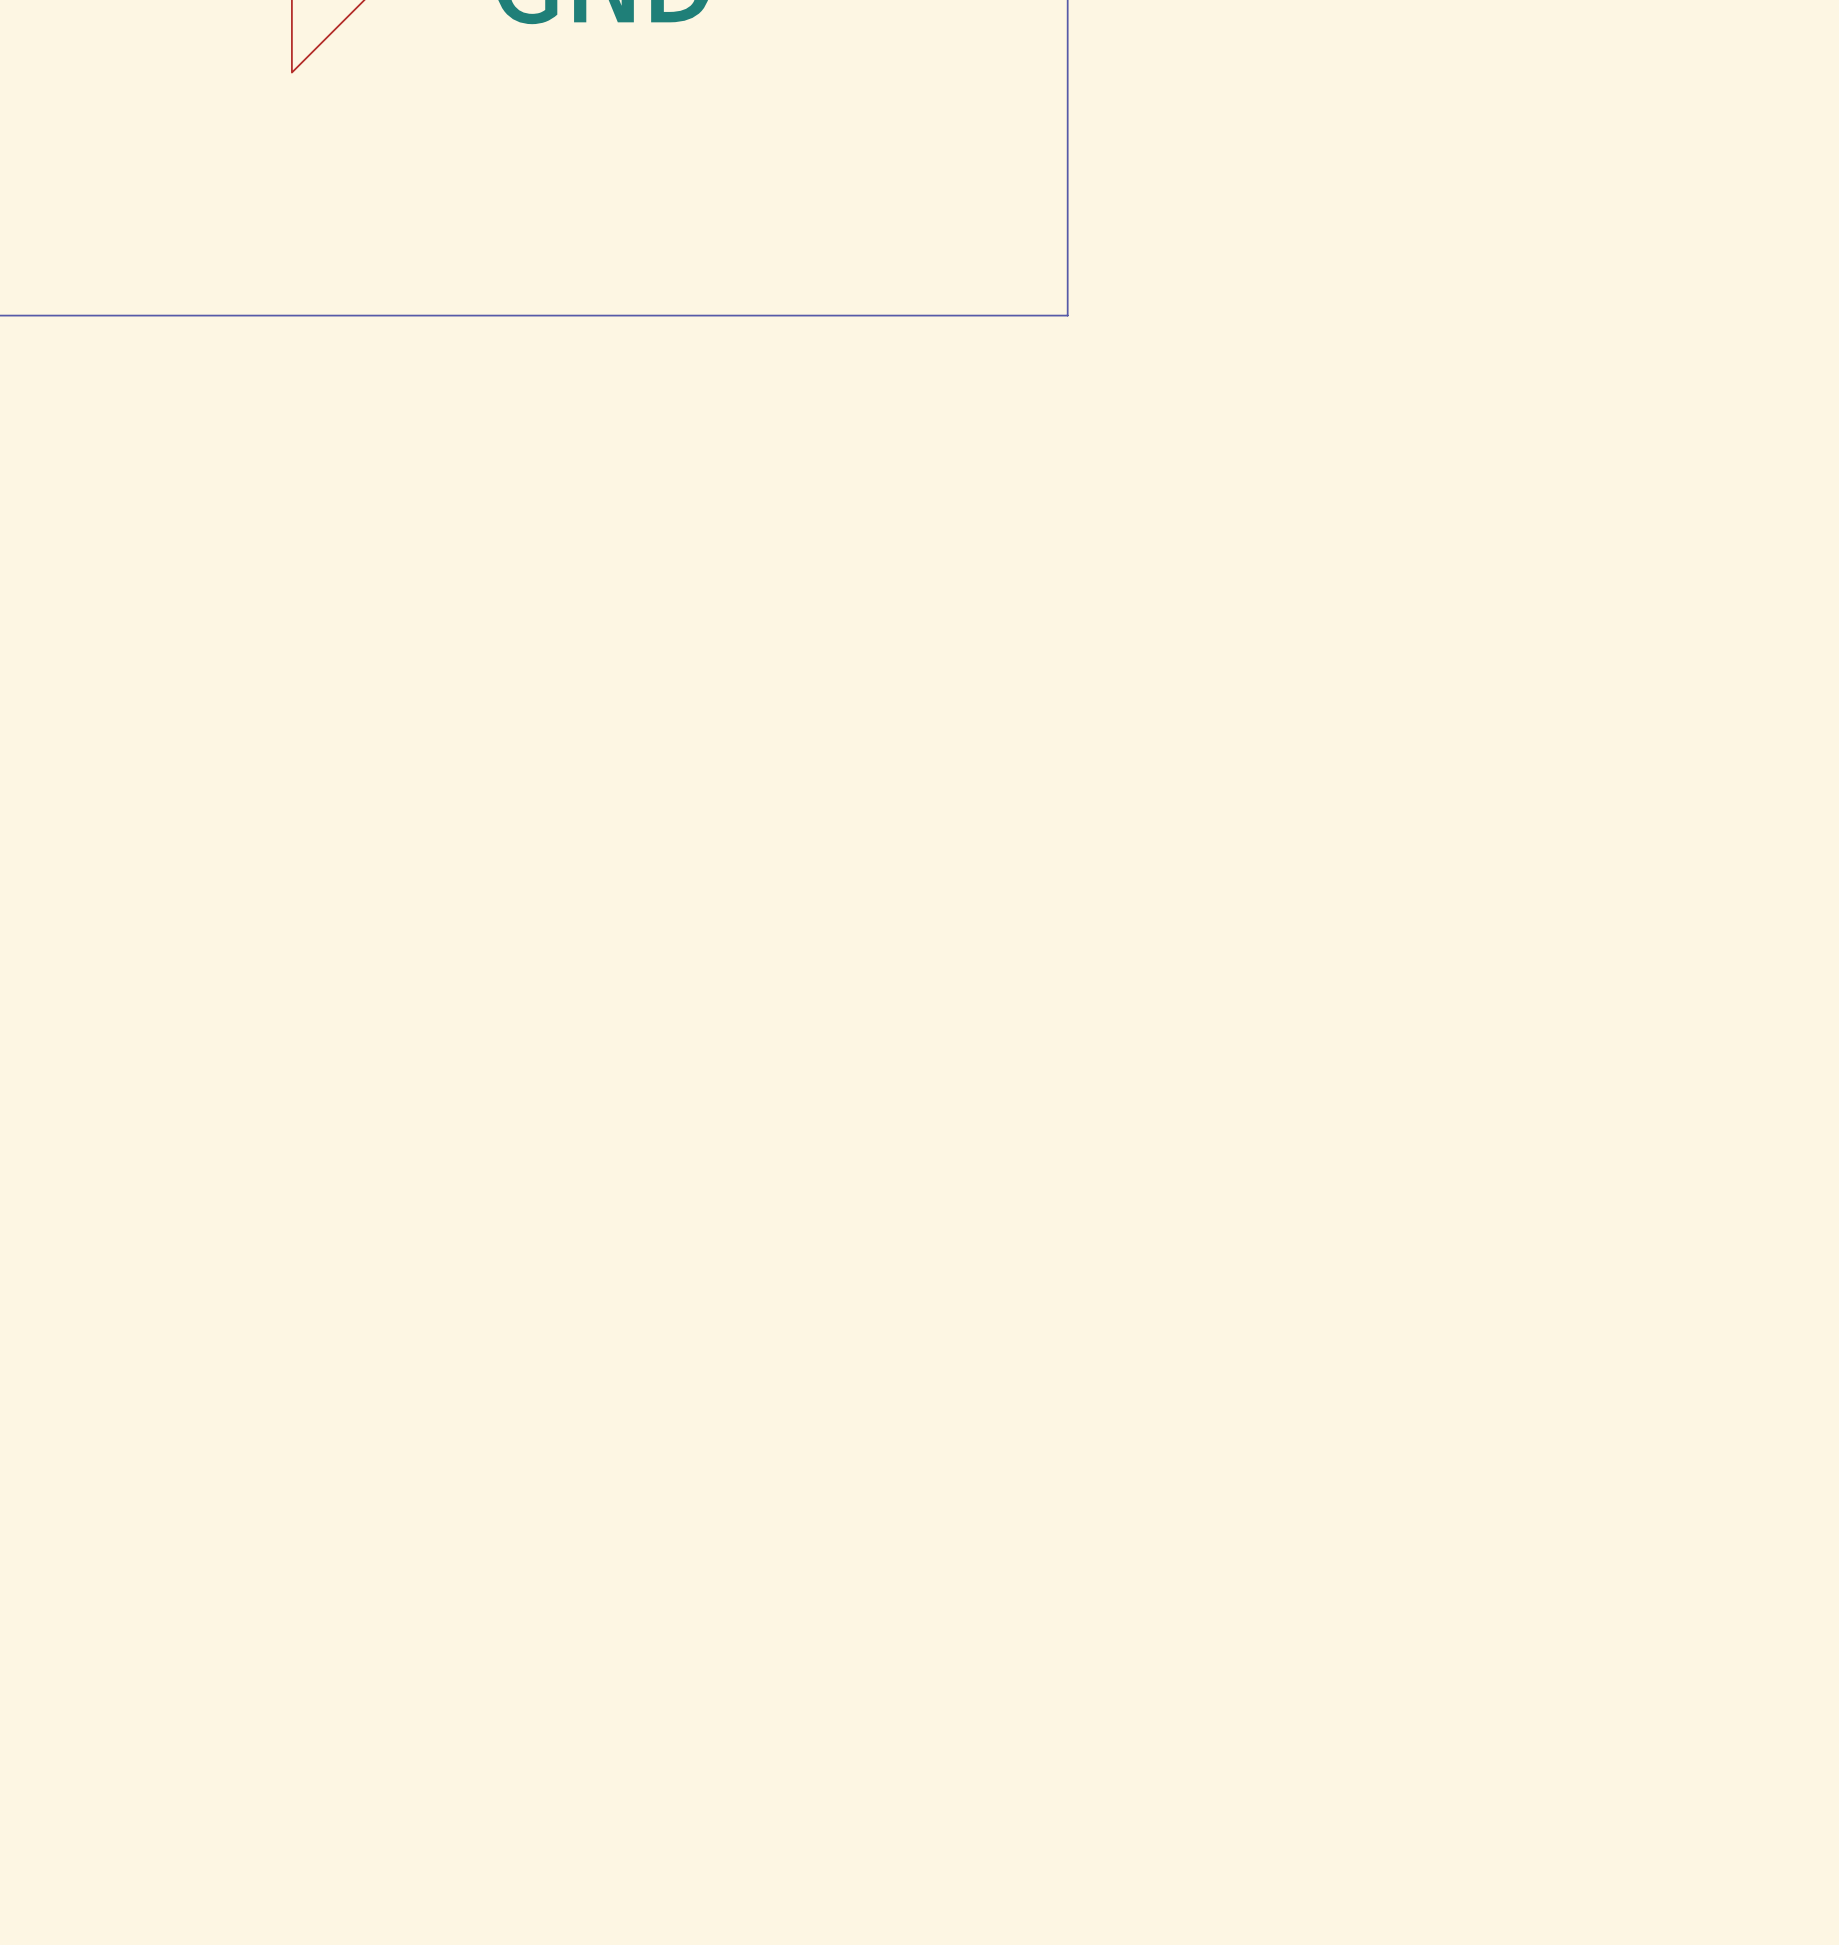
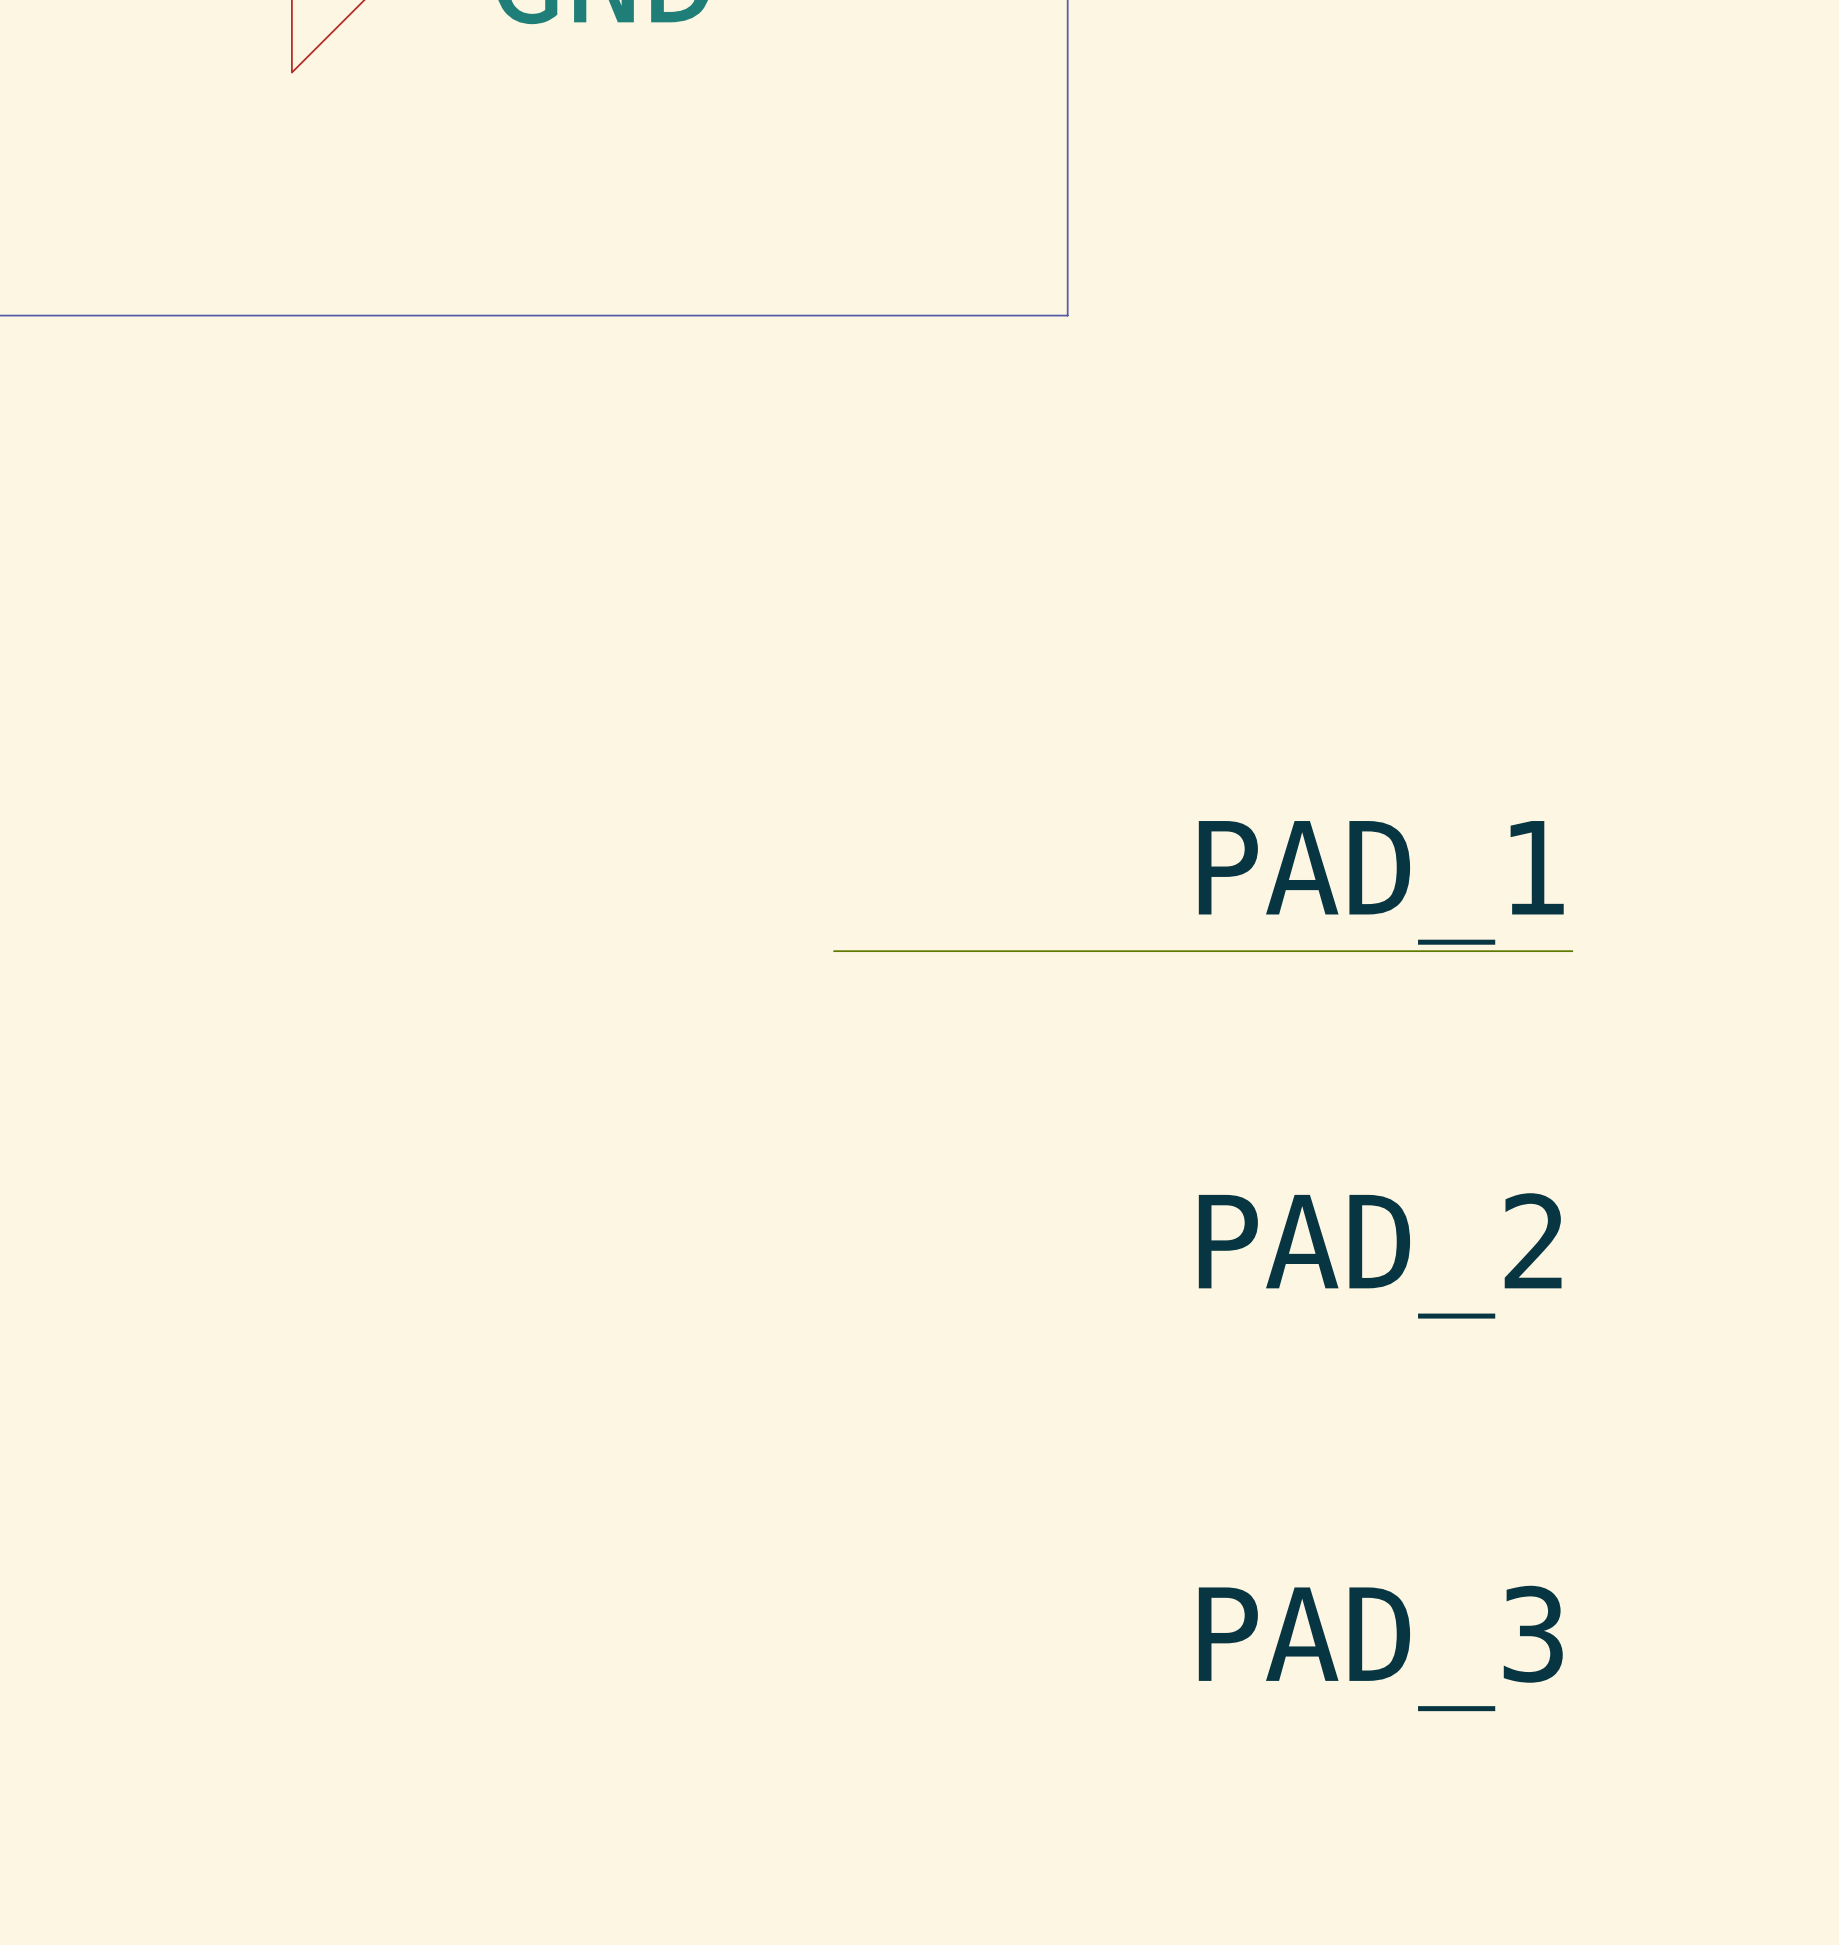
label: none -> PAD_1 (1381, 882)
wire: none -> (834, 951) (1572, 951)
label: none -> PAD_2 (1380, 1255)
label: none -> PAD_3 (1380, 1648)

